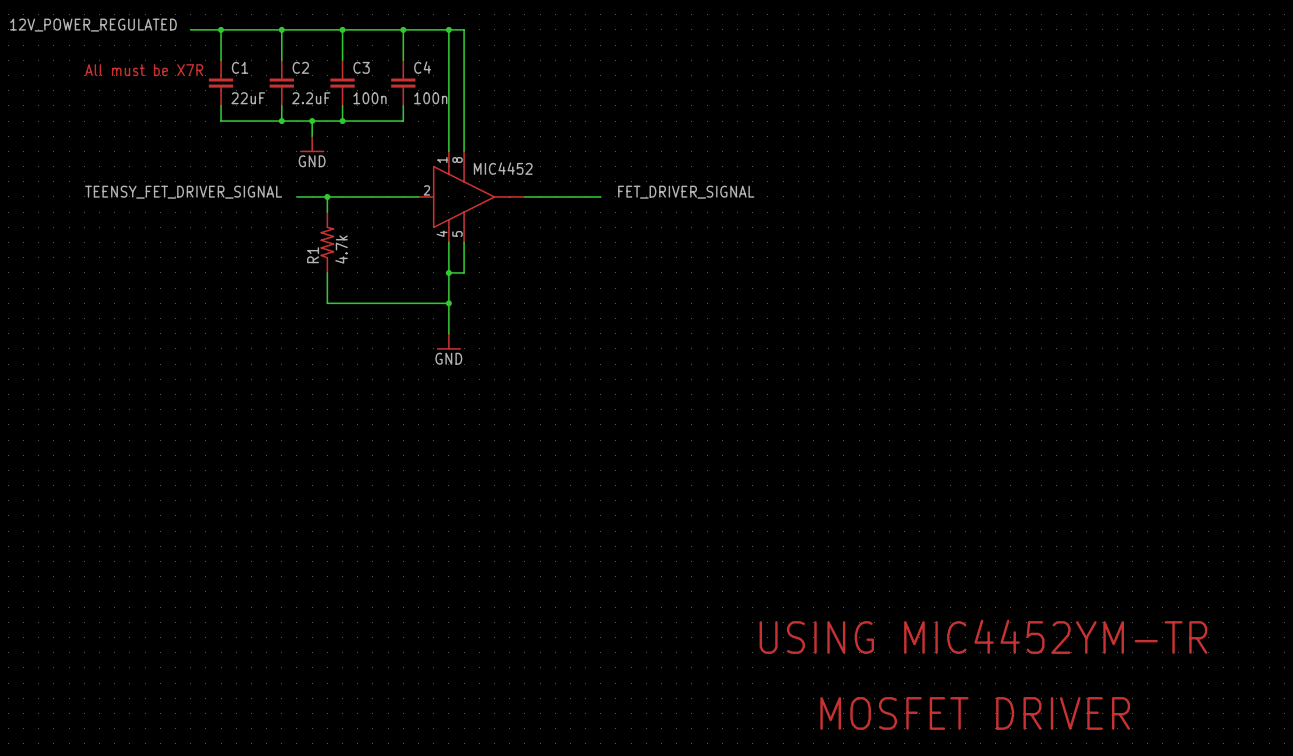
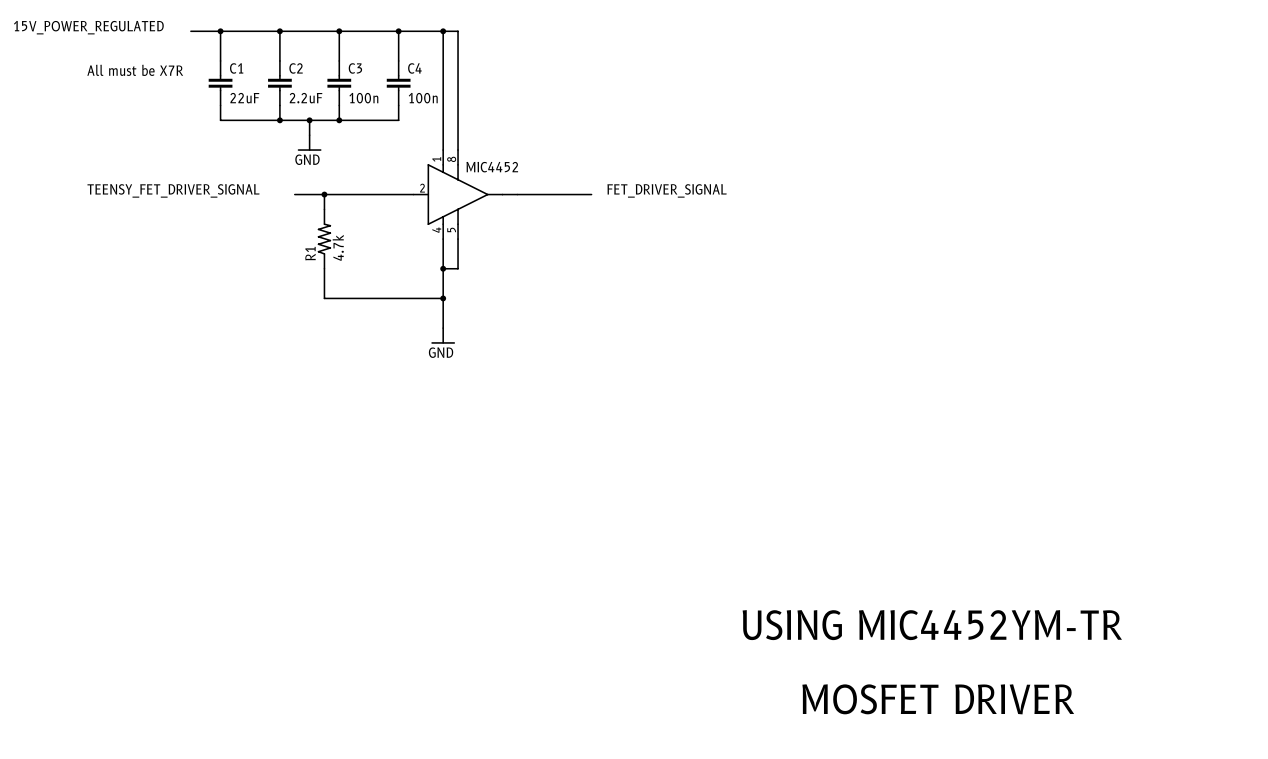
label: 12V_POWER_REGULATED (93, 25) -> 15V_POWER_REGULATED (88, 27)

